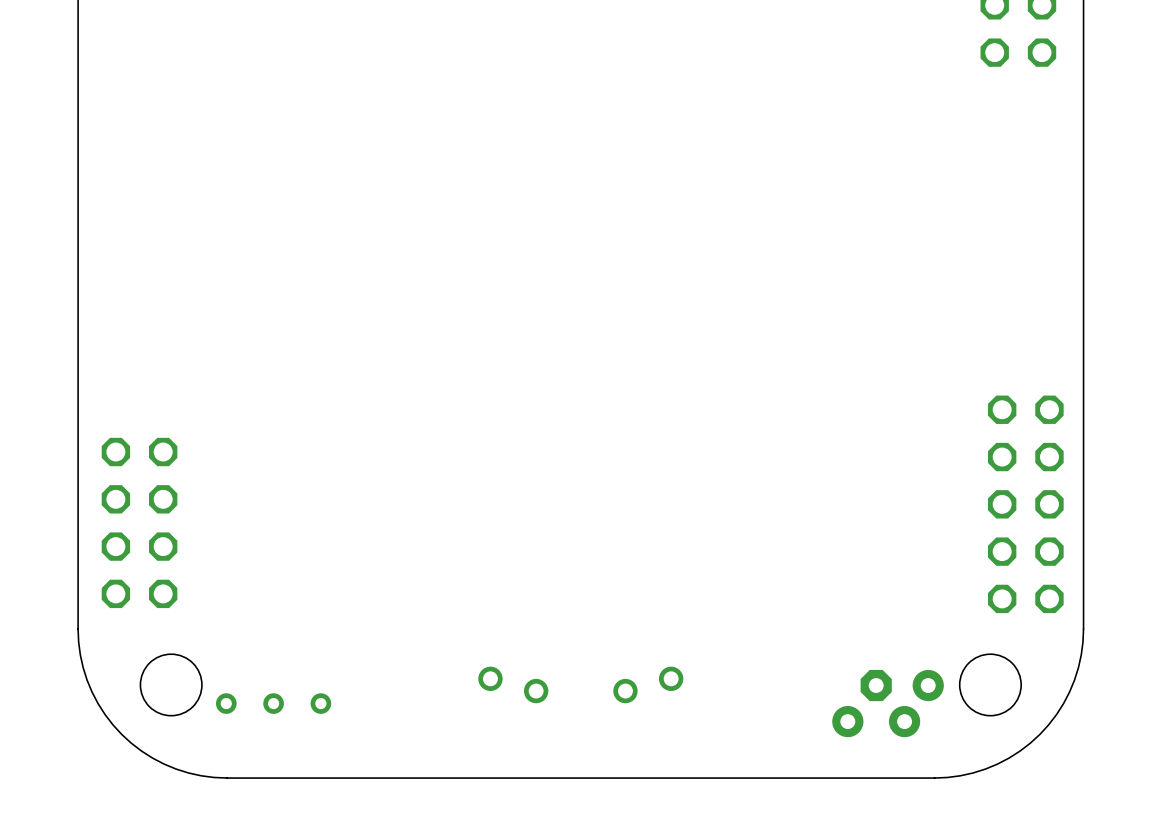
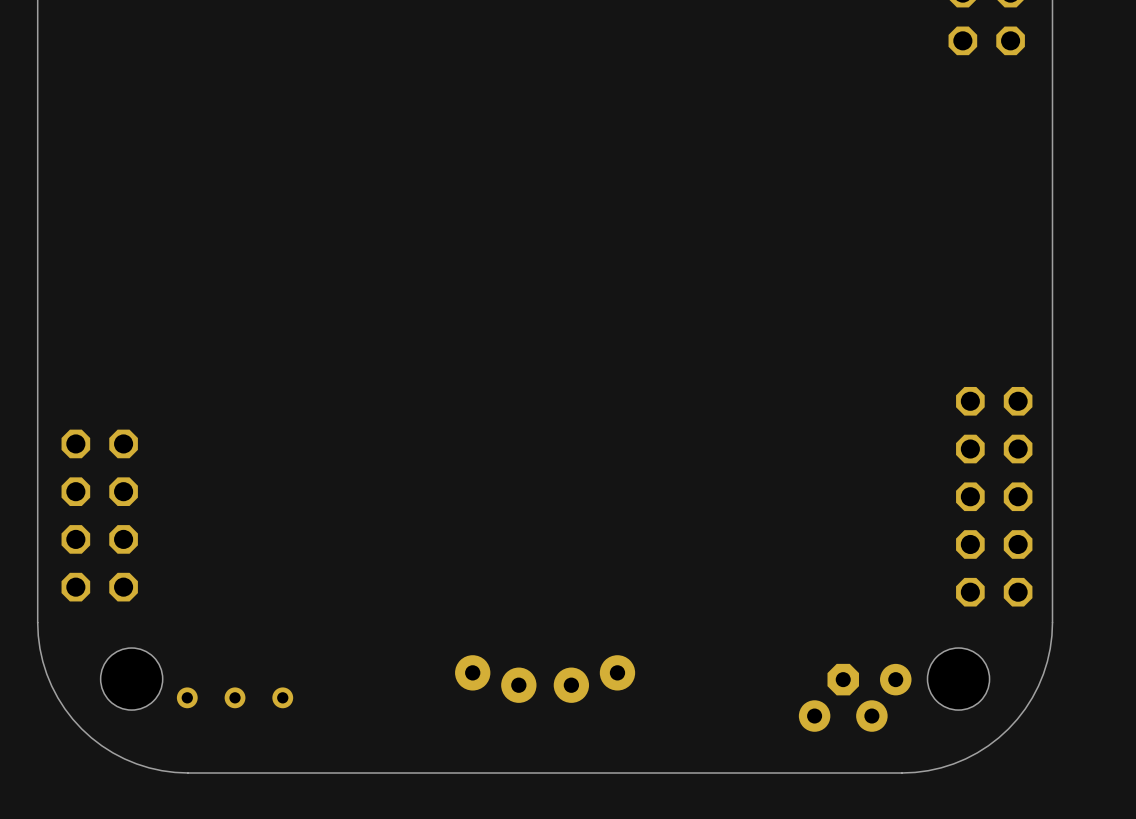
part footprint: [478, 666, 549, 704] -> [455, 655, 537, 703]
part footprint: [613, 666, 684, 704] -> [553, 655, 636, 703]

